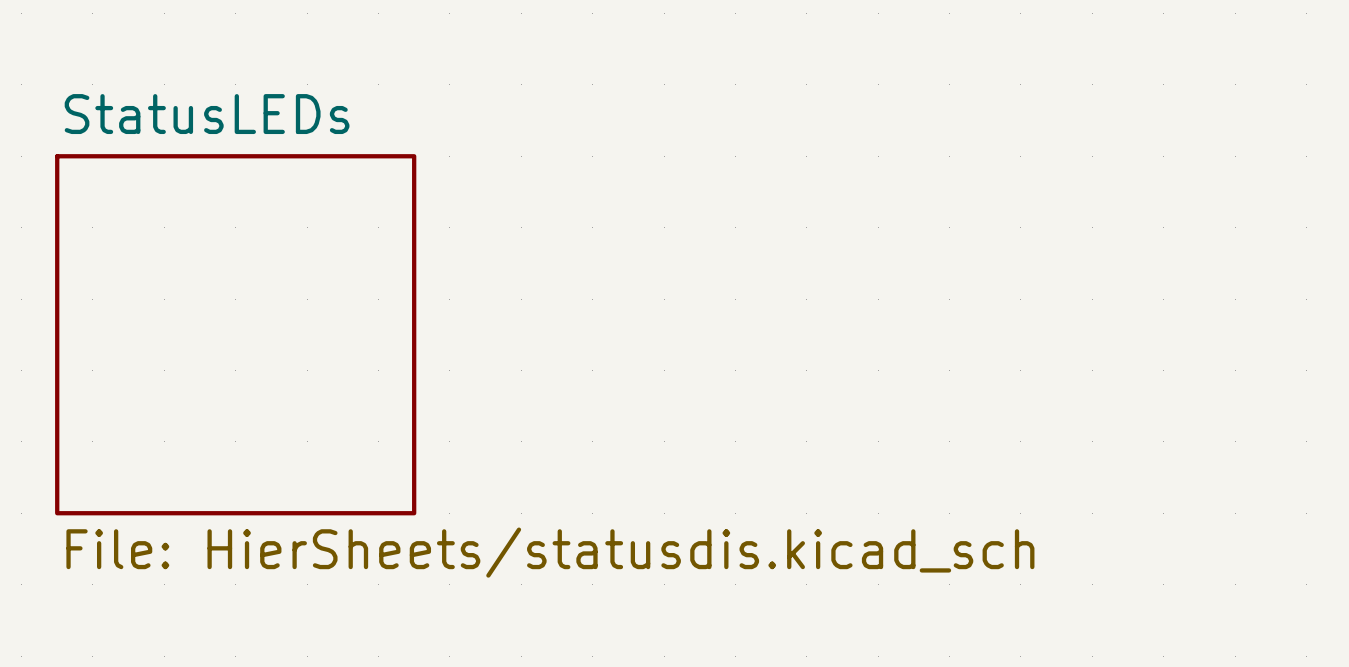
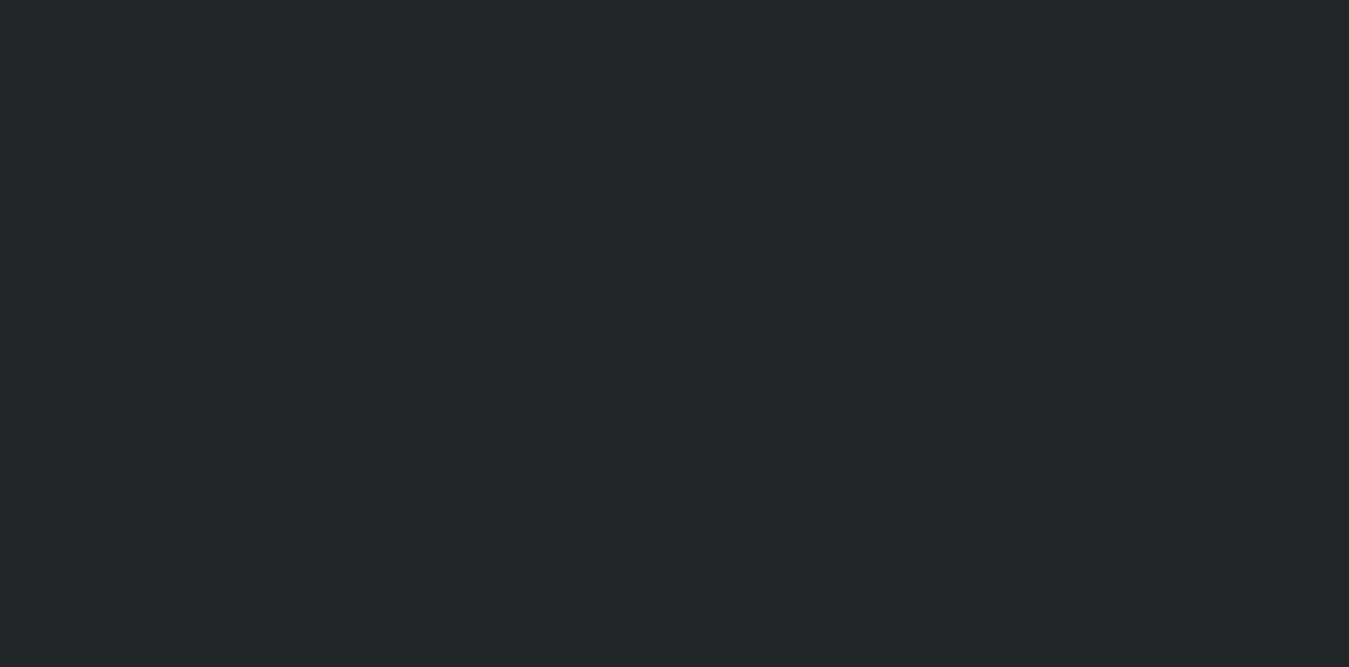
sheet StatusLEDs: File: HierSheets/statusdis.kicad_sch (235, 334) -> none

